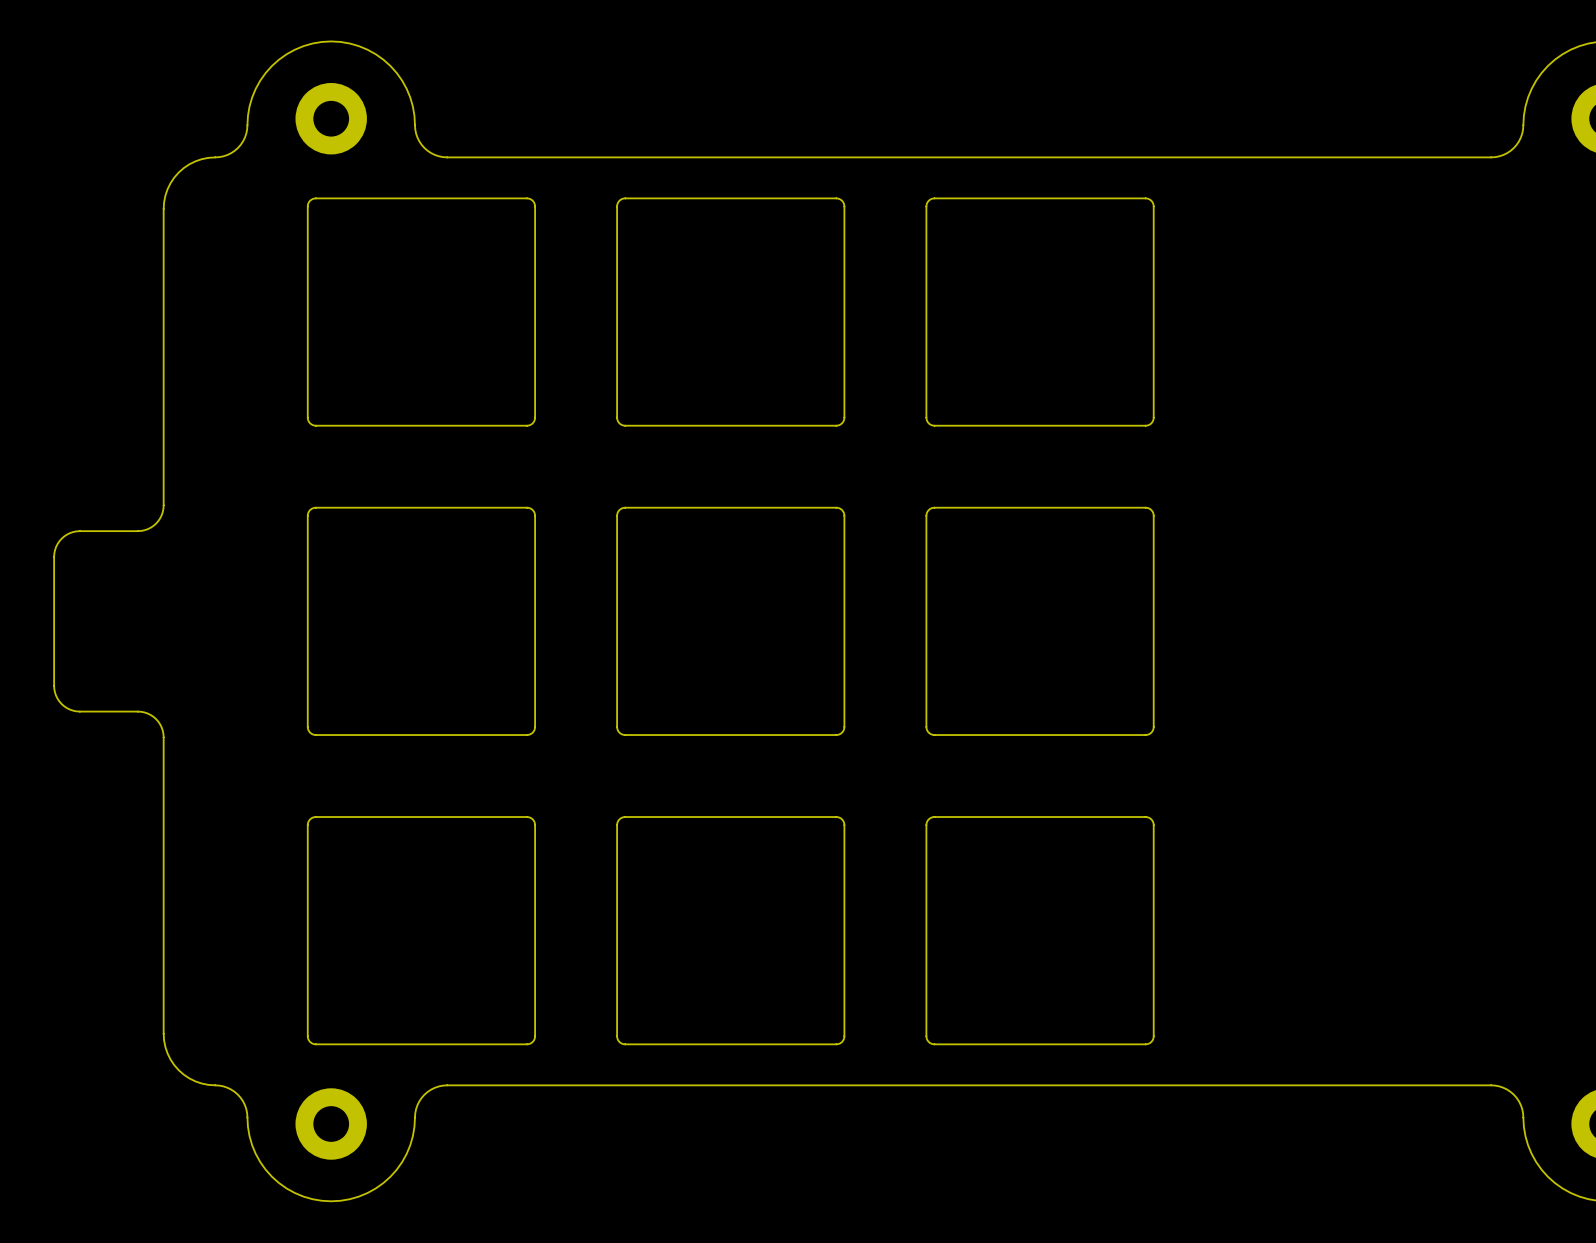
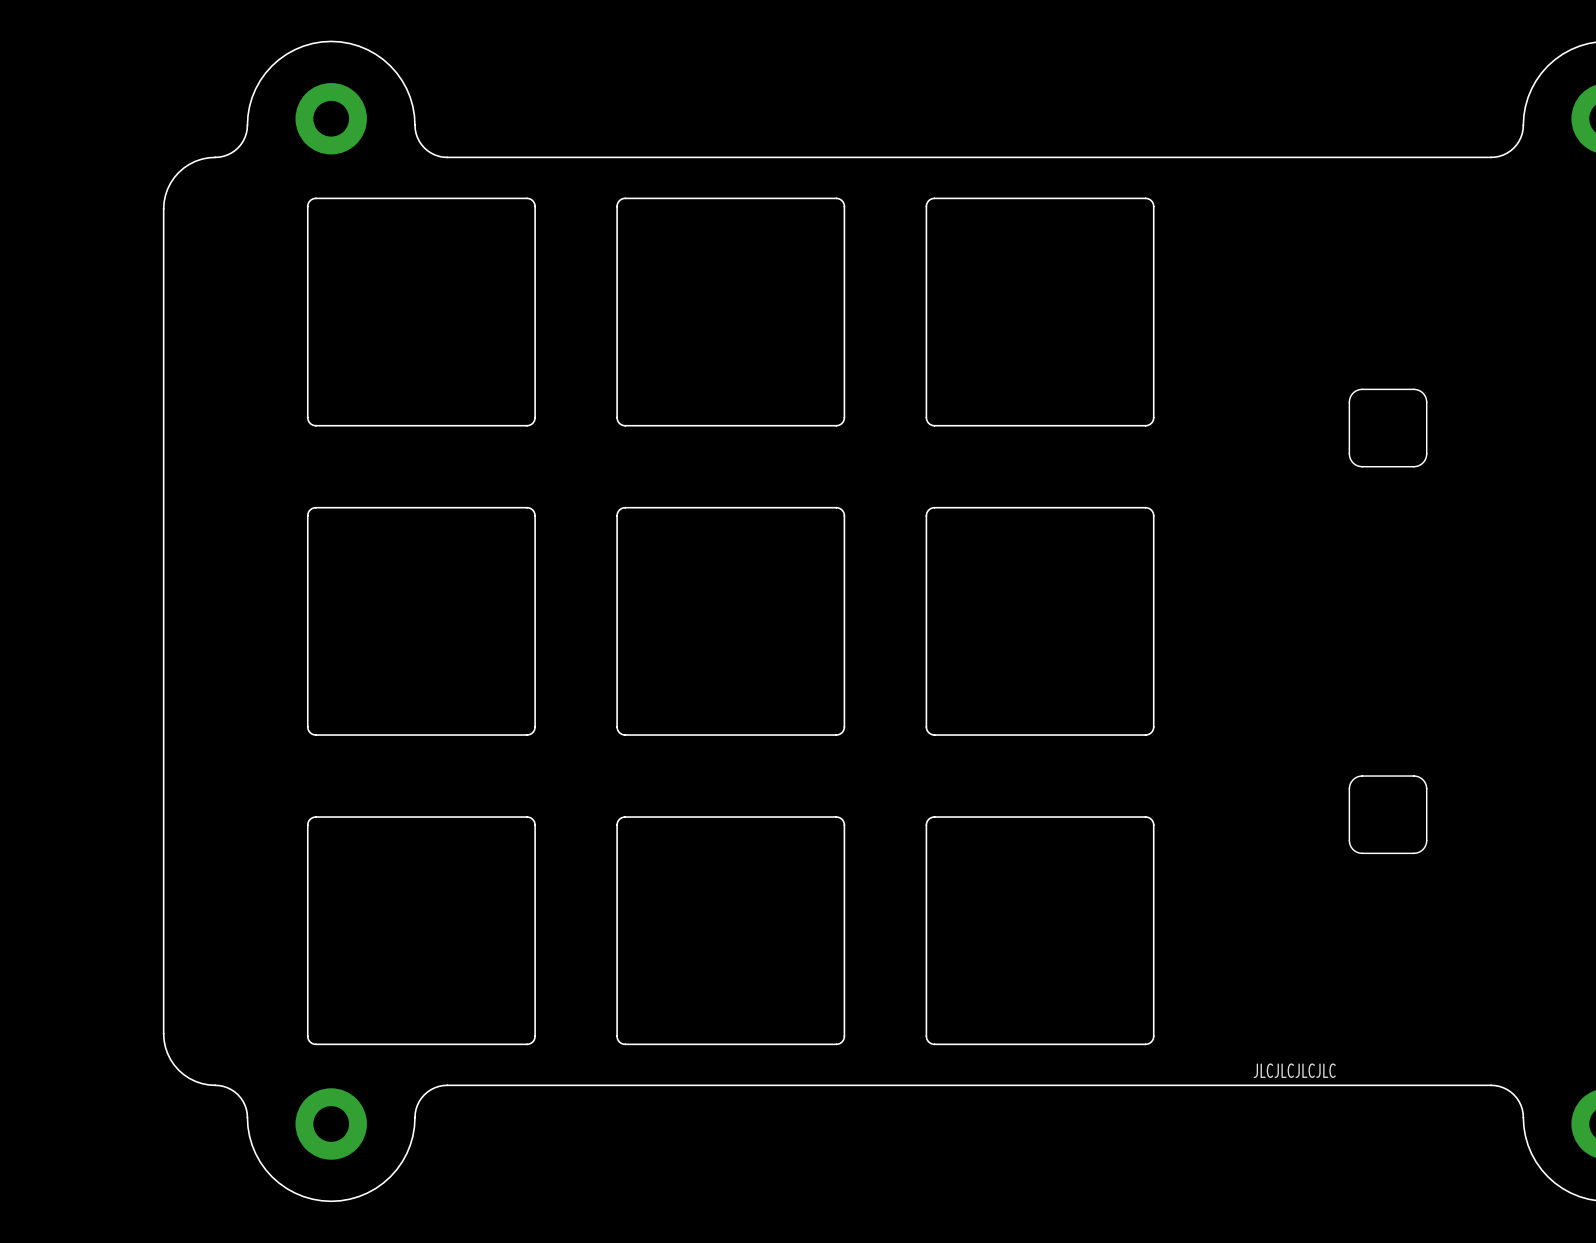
board edge: none -> (1413, 389) (1360, 389) (1352, 394) (1349, 402) (1349, 453) (1354, 464) (1362, 466) (1413, 466) (1424, 461) (1426, 453) (1426, 400) (1421, 392) (1413, 389)
board edge: (163, 505) (158, 521) (147, 529) (137, 531) (73, 532) (59, 541) (54, 556) (54, 685) (57, 698) (64, 706) (76, 711) (137, 711) (147, 713) (158, 721) (163, 737) -> (163, 505) (163, 737)
board edge: none -> (1413, 776) (1360, 776) (1352, 781) (1349, 788) (1349, 840) (1354, 850) (1362, 853) (1413, 853) (1424, 848) (1426, 840) (1426, 787) (1422, 779) (1413, 776)
text: none -> JLCJLCJLCJLC (1294, 1070)

